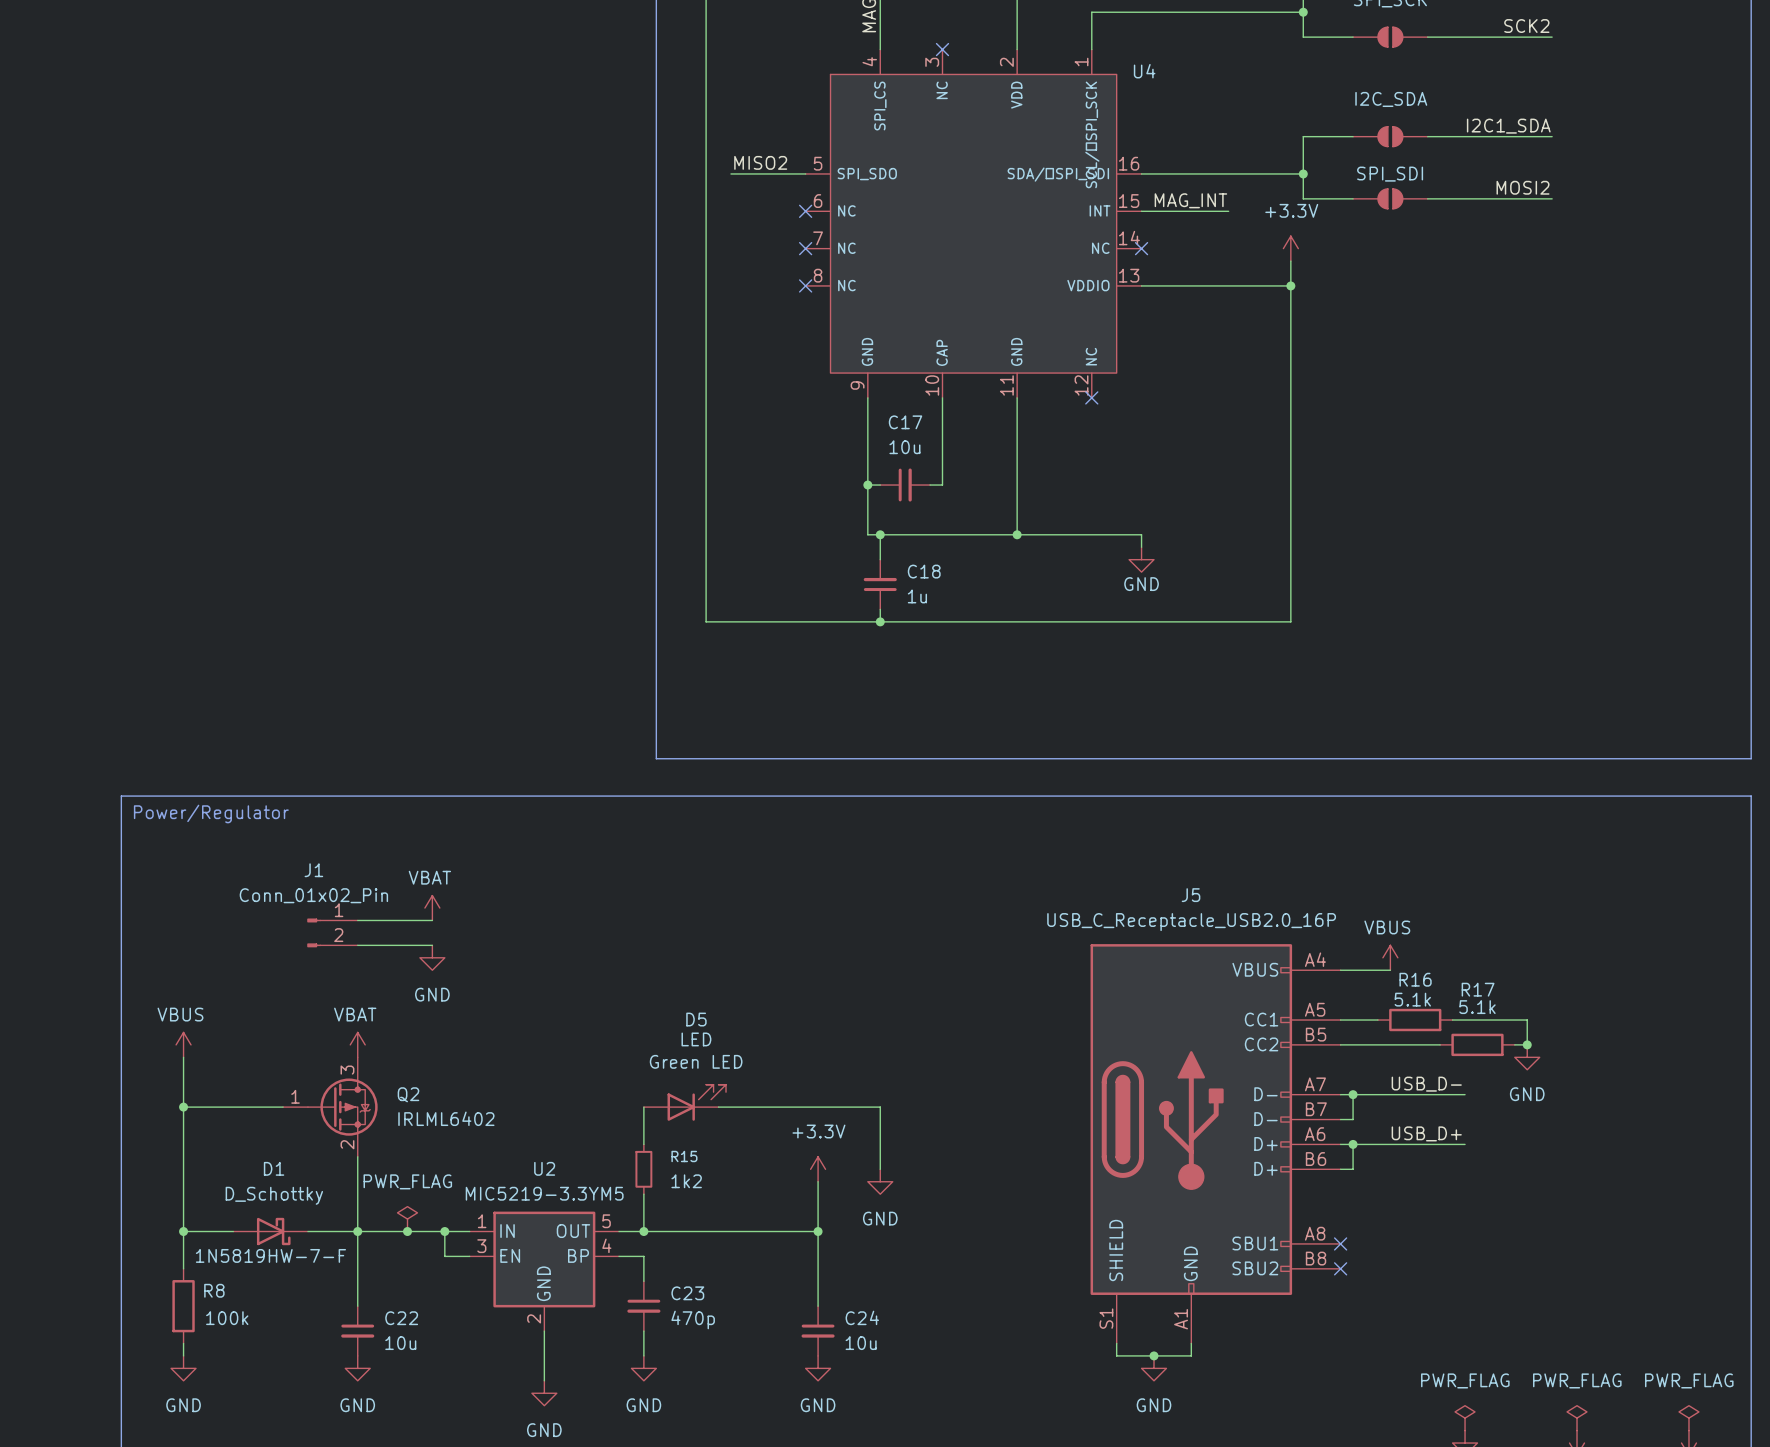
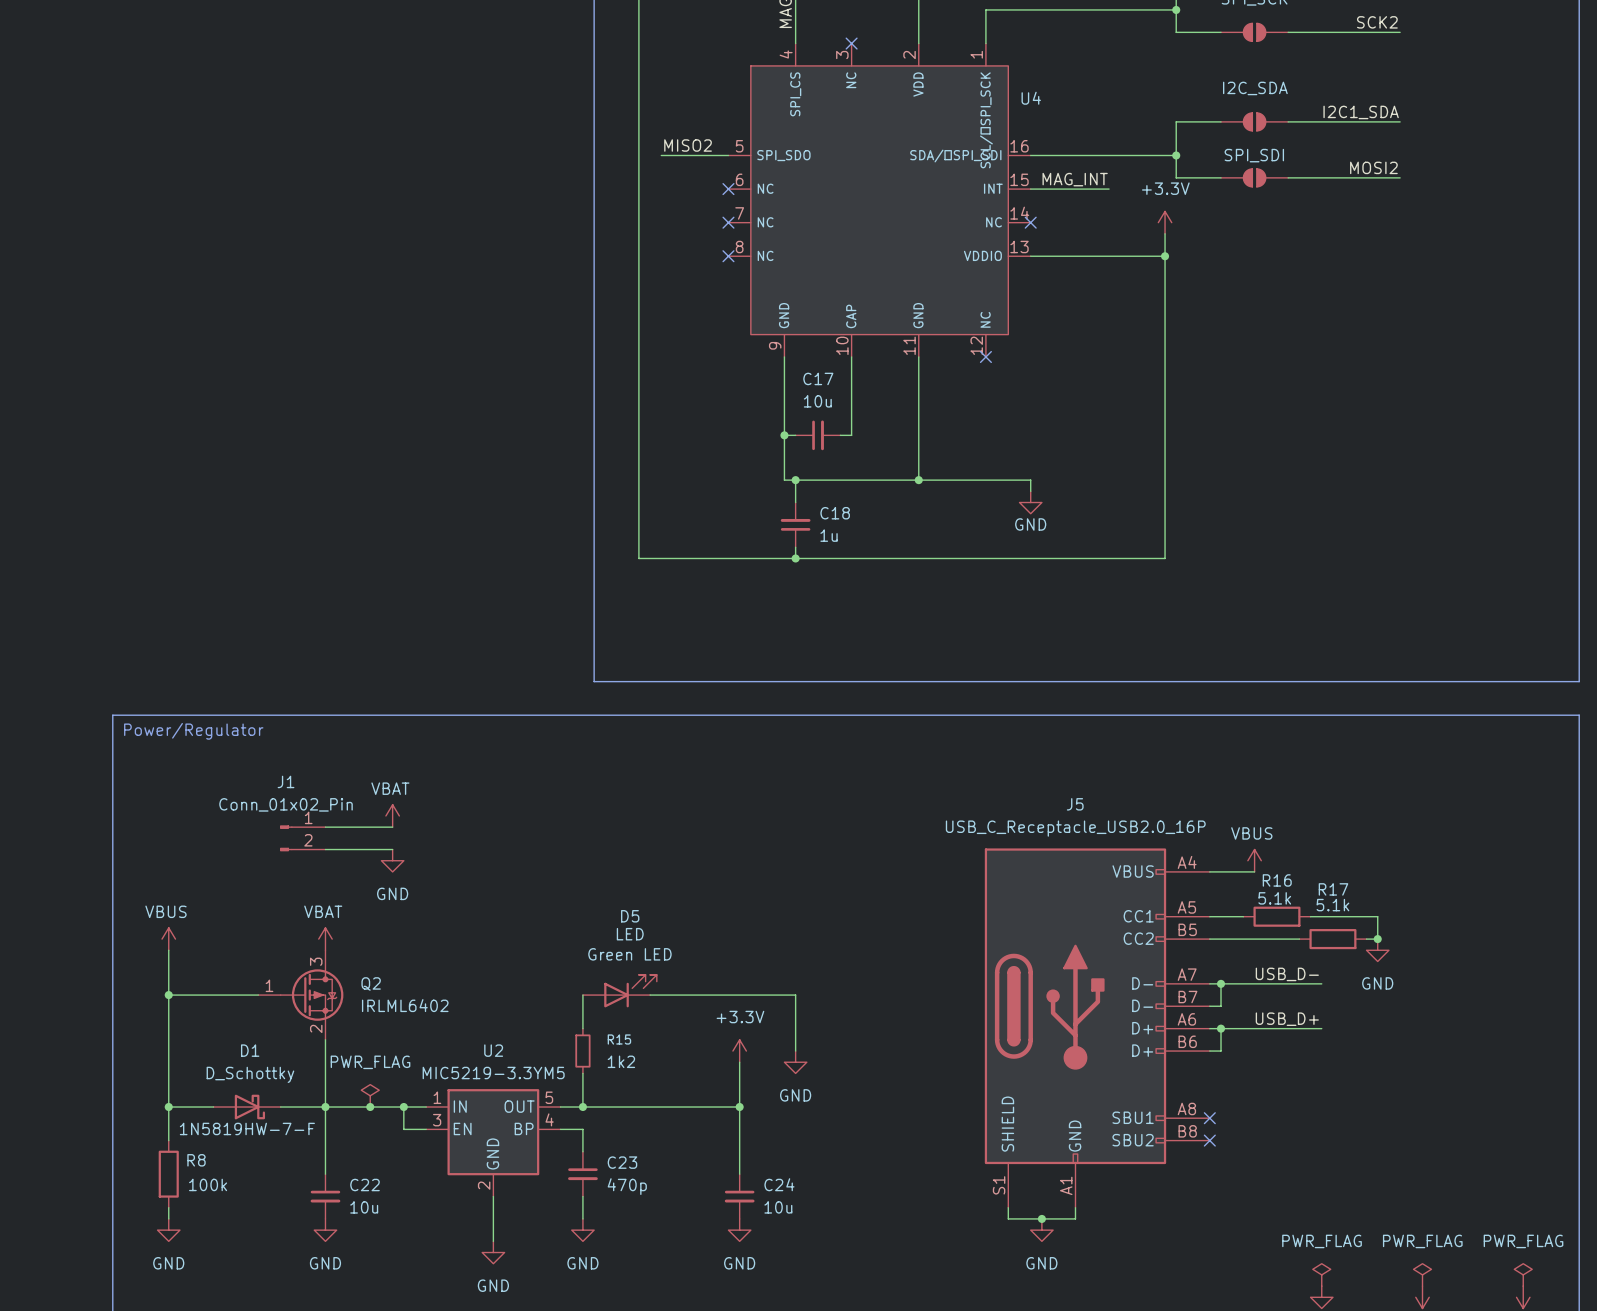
U4 name position: U4 (1144, 71) -> U4 (1031, 98)

